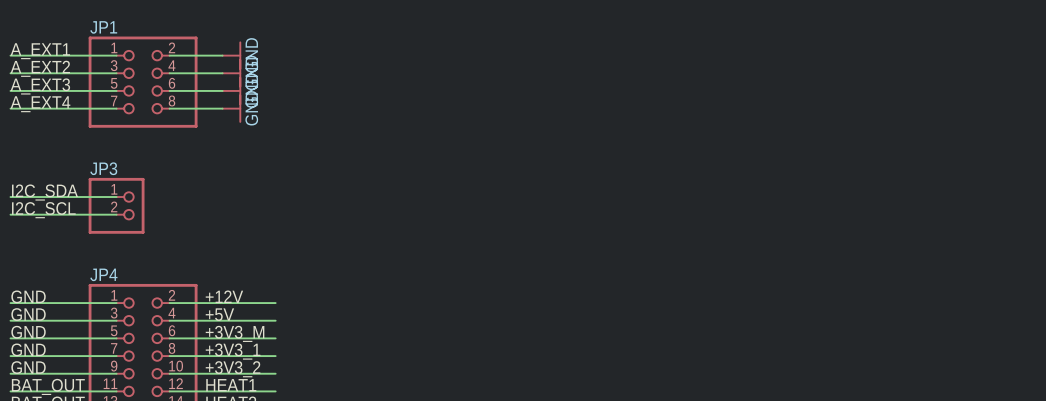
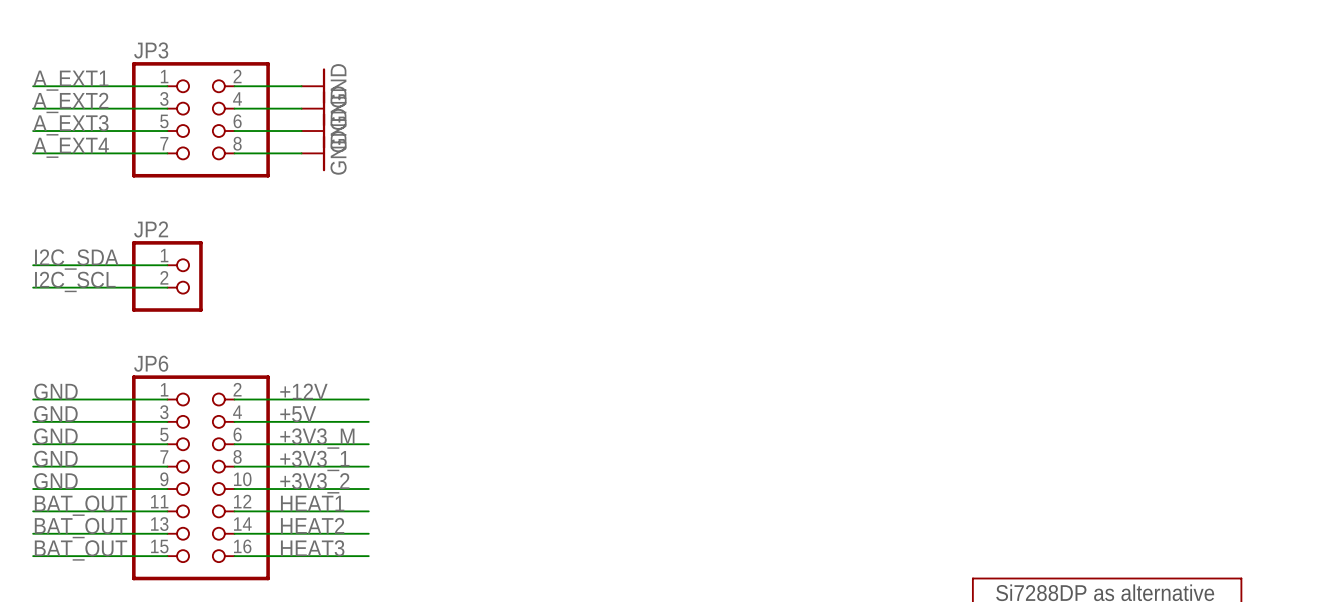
JP1 name: JP1 (103, 27) -> JP3 (151, 50)
JP3 name: JP3 (103, 168) -> JP2 (151, 229)
JP4 name: JP4 (103, 274) -> JP6 (151, 363)

